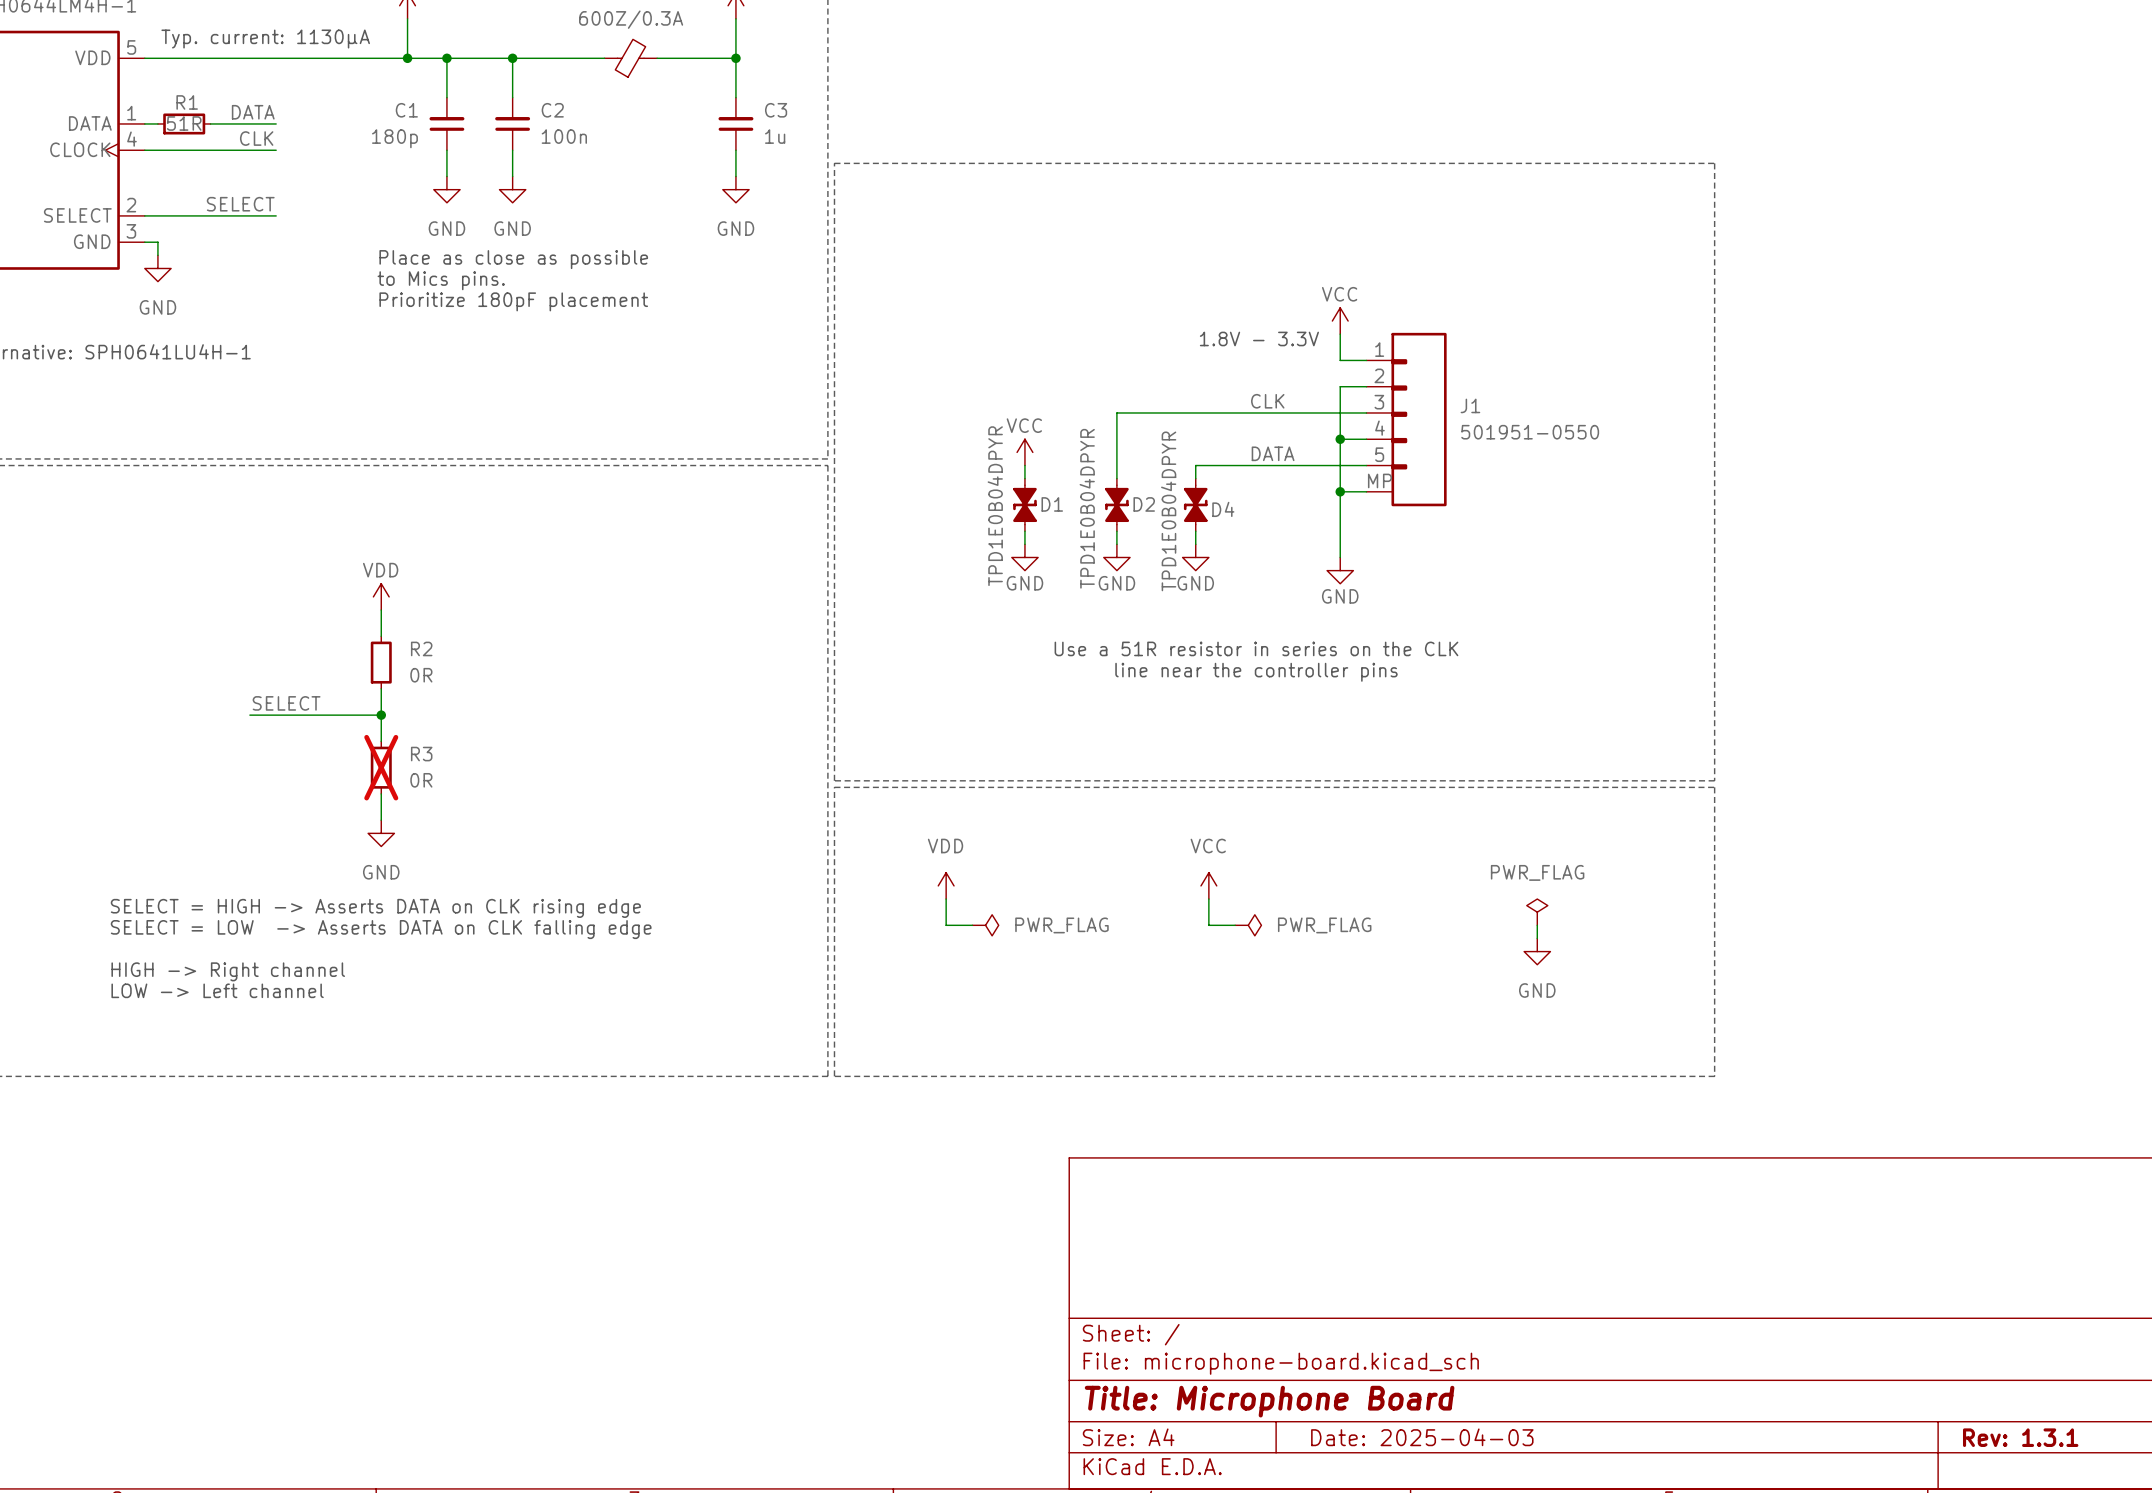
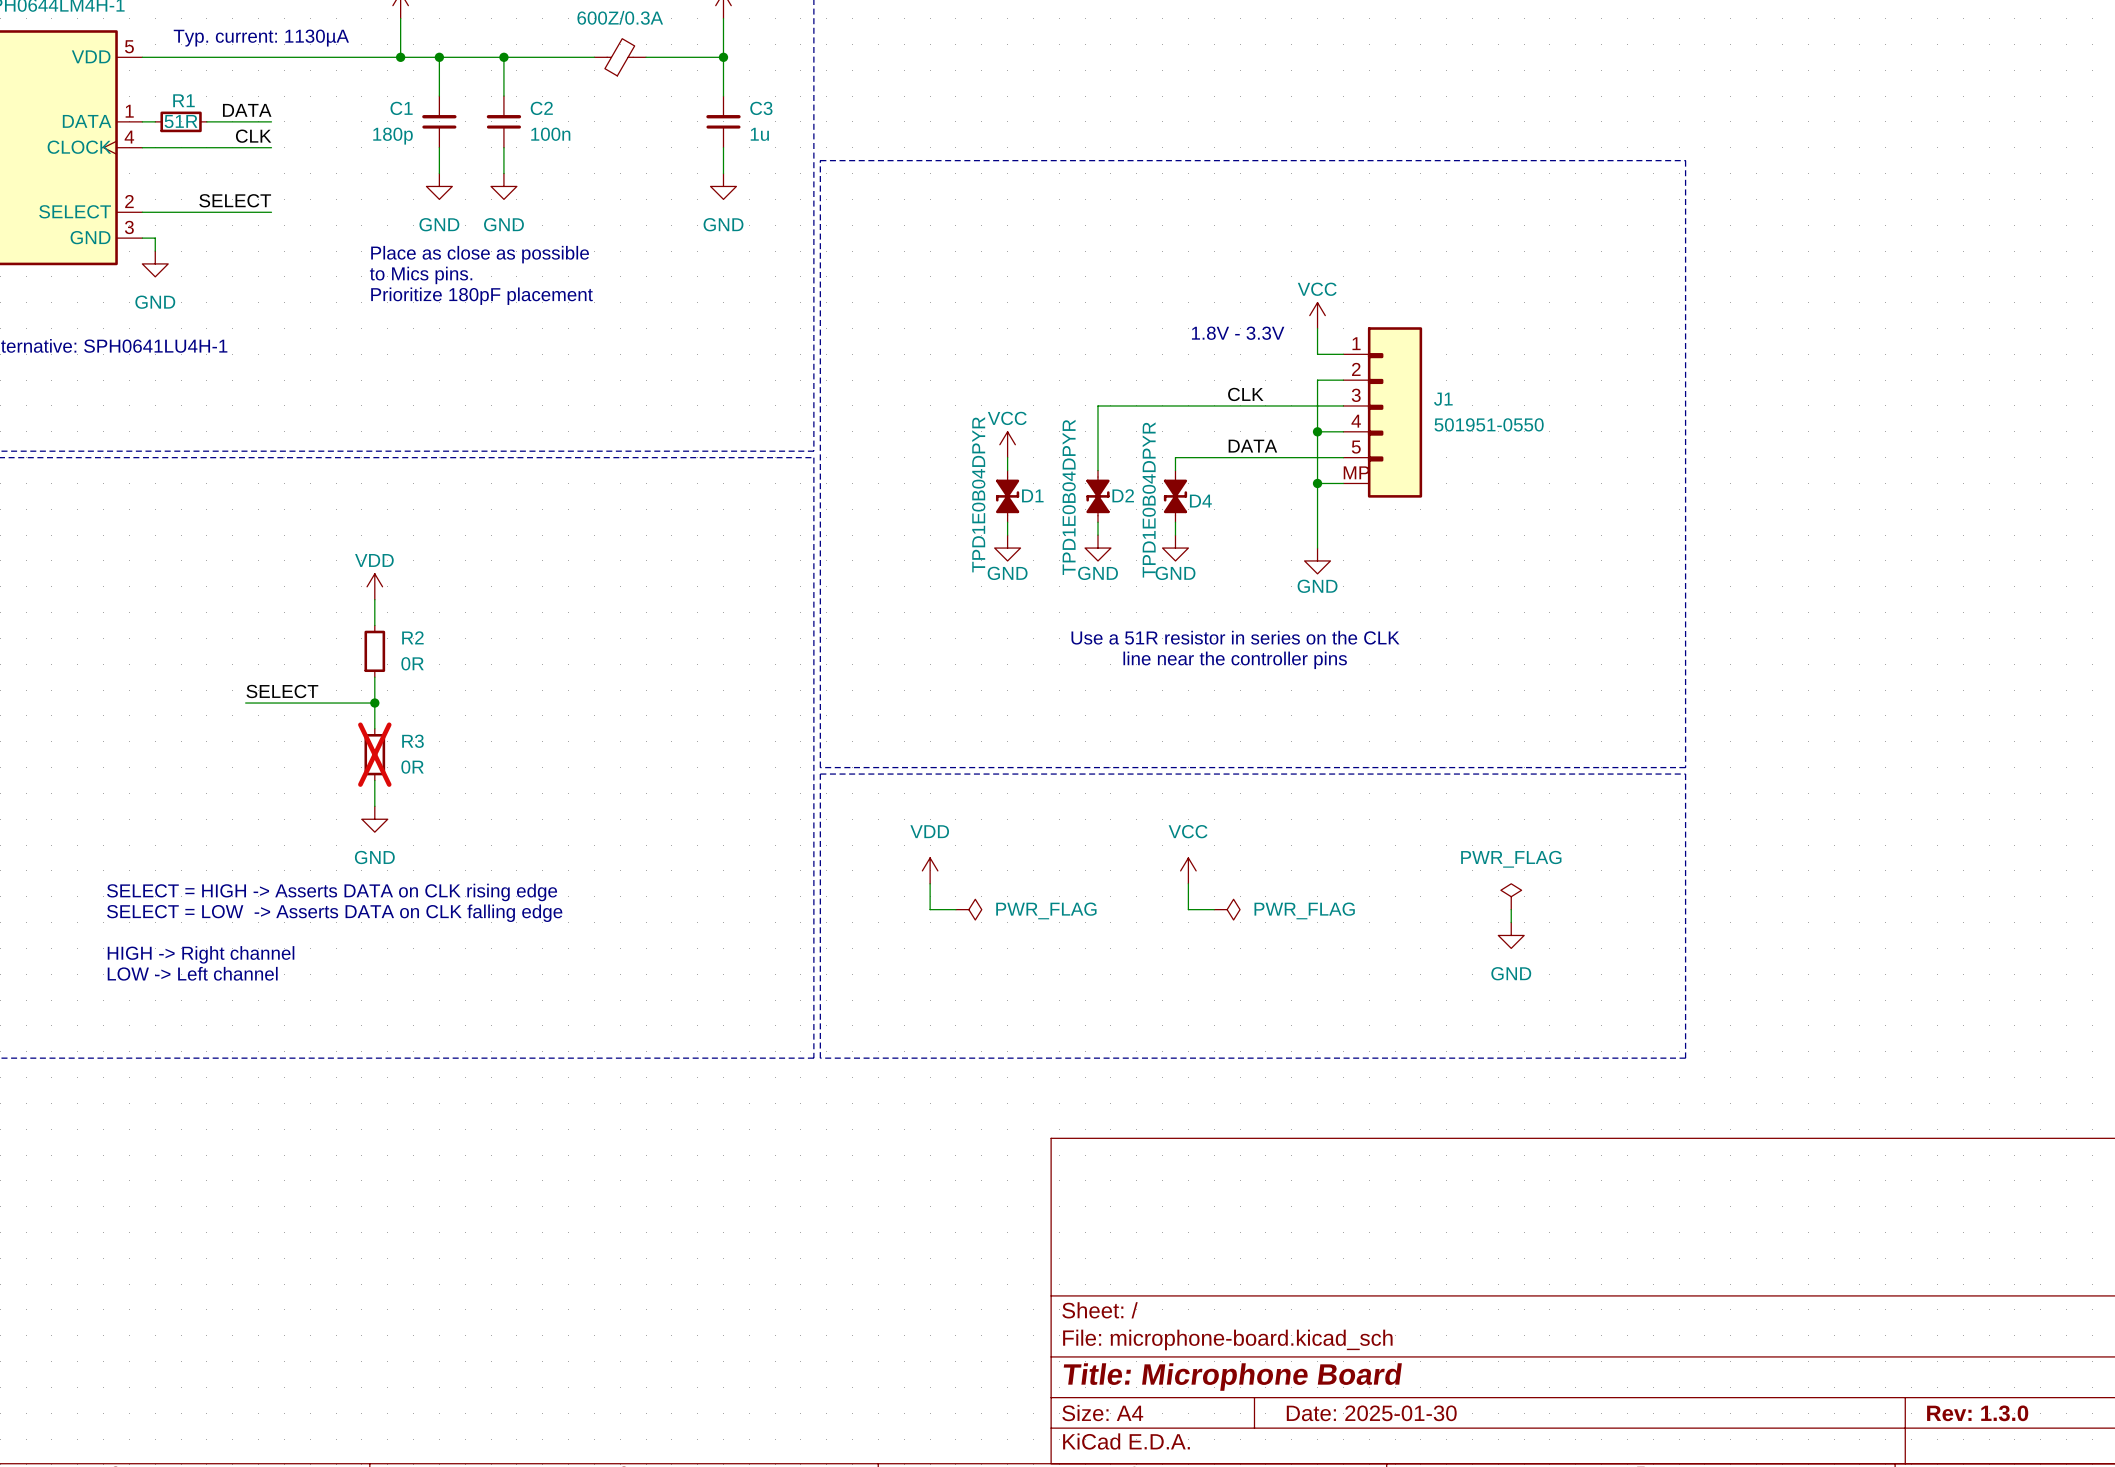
title block: Date: 2025-04-03 (1422, 1437) -> Date: 2025-01-30 (1371, 1413)
title block: Rev: 1.3.1 (2020, 1437) -> Rev: 1.3.0 (1977, 1413)

